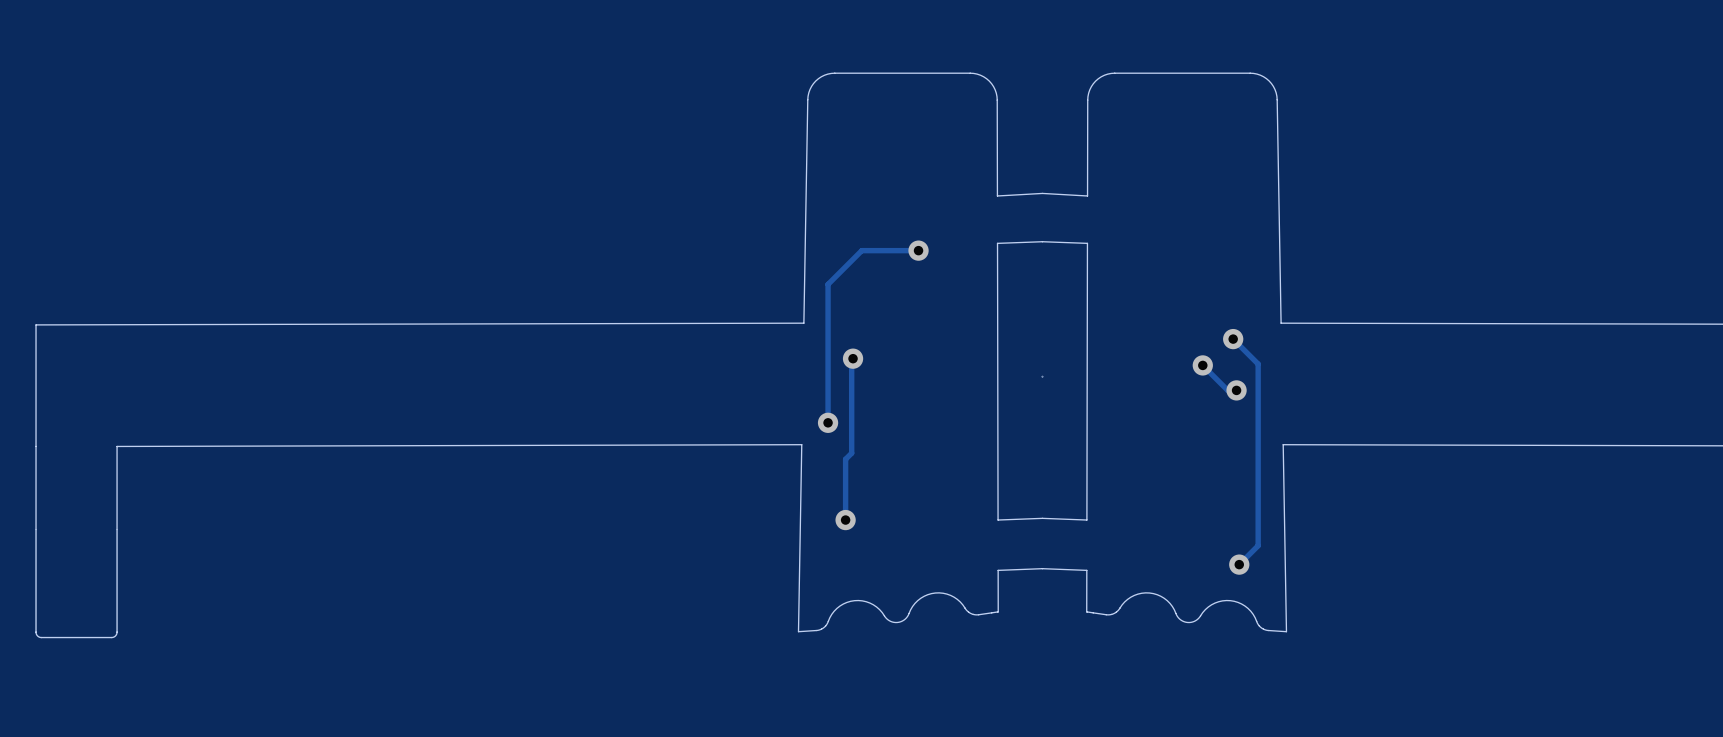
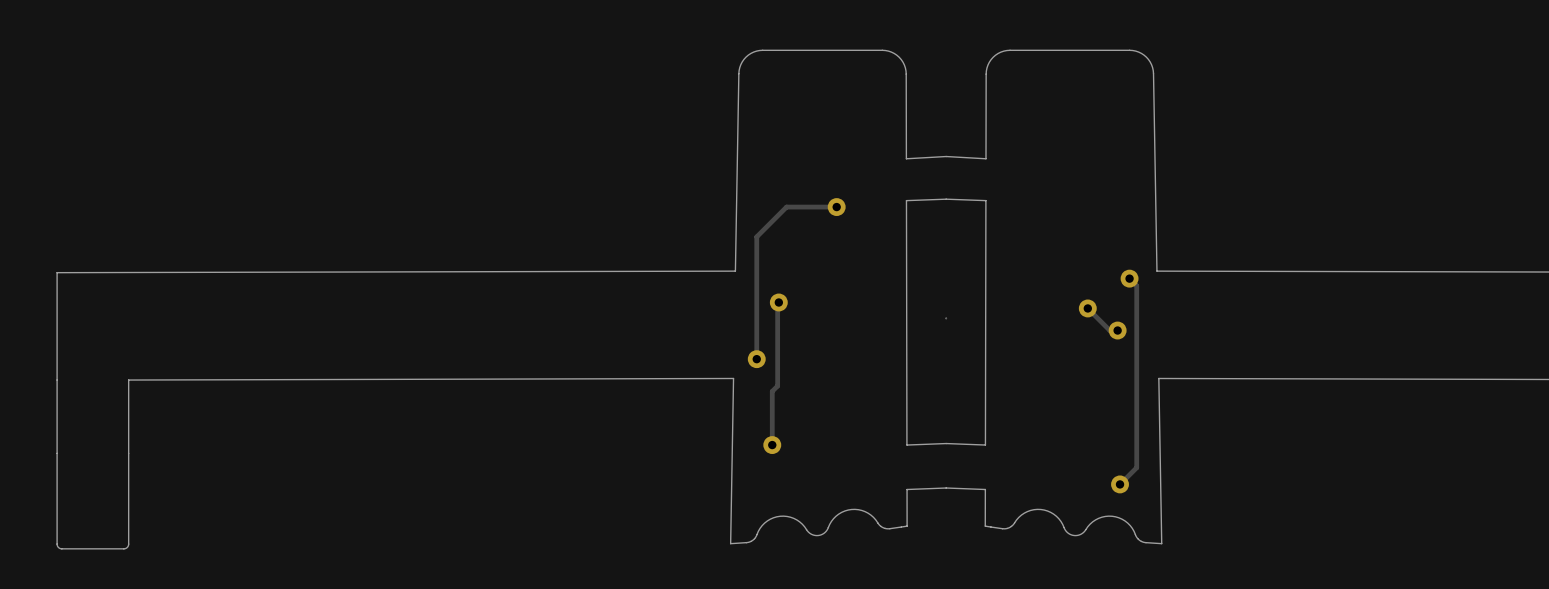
track: (1233, 339) (1258, 364) -> (1129, 278) (1136, 285) (1136, 307)
via position: (1233, 339) -> (1129, 278)

